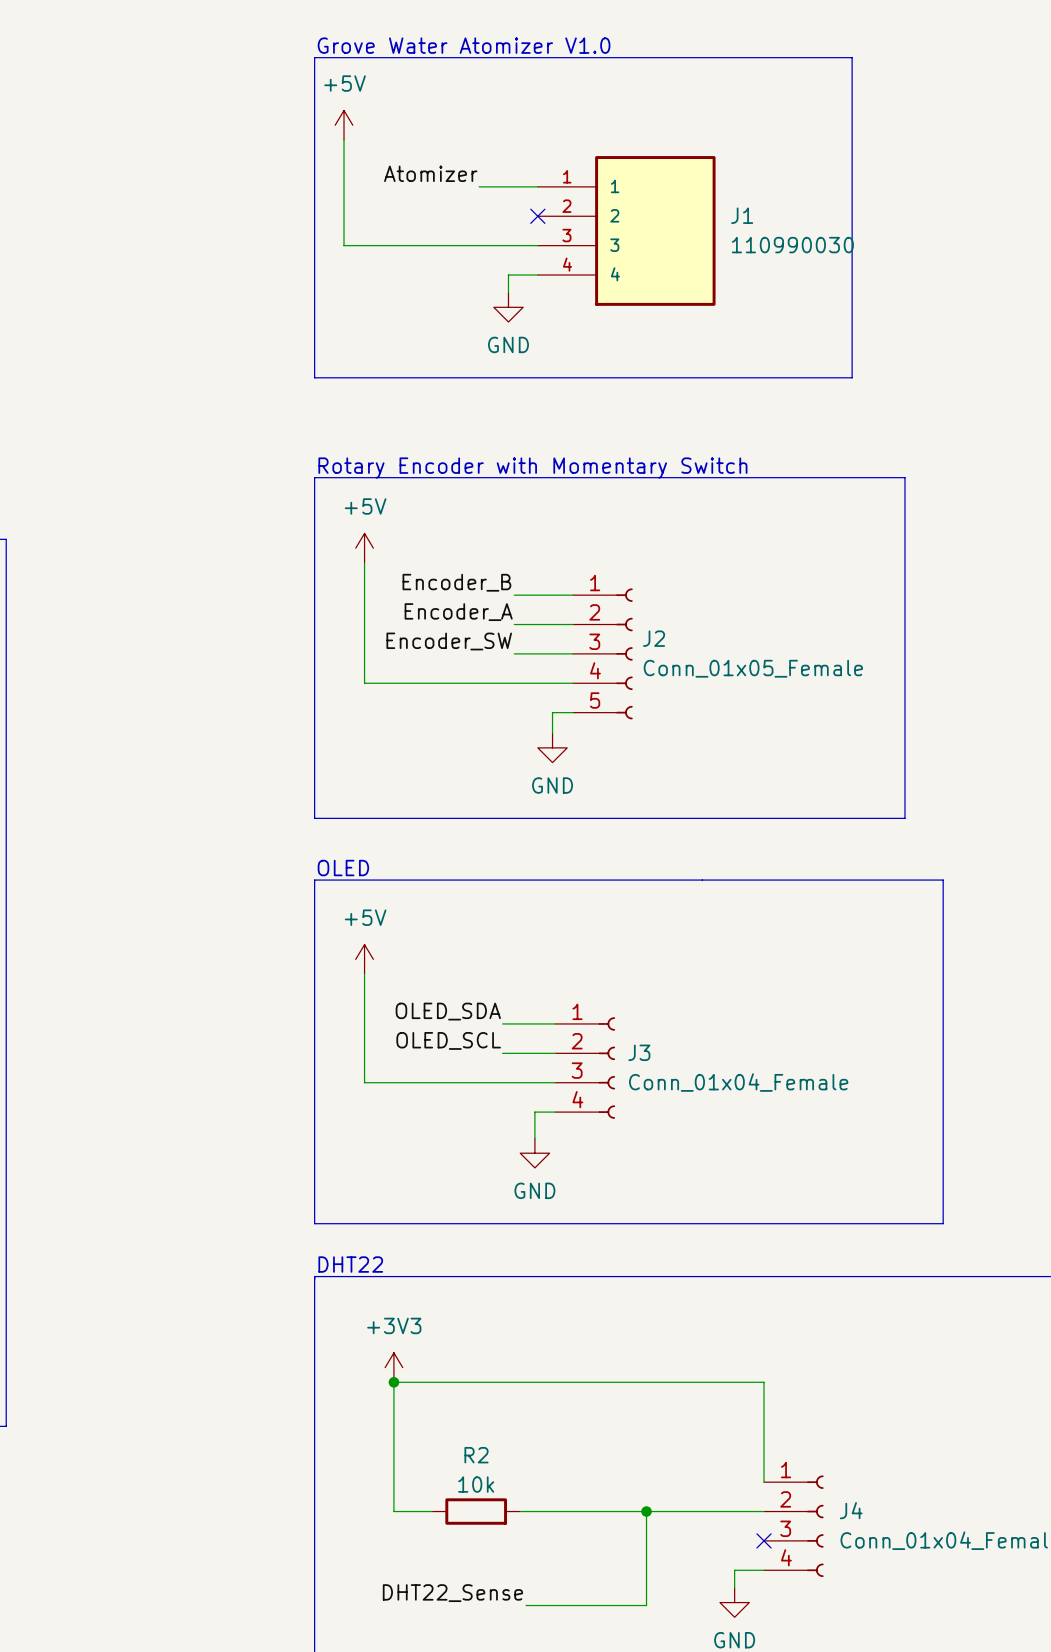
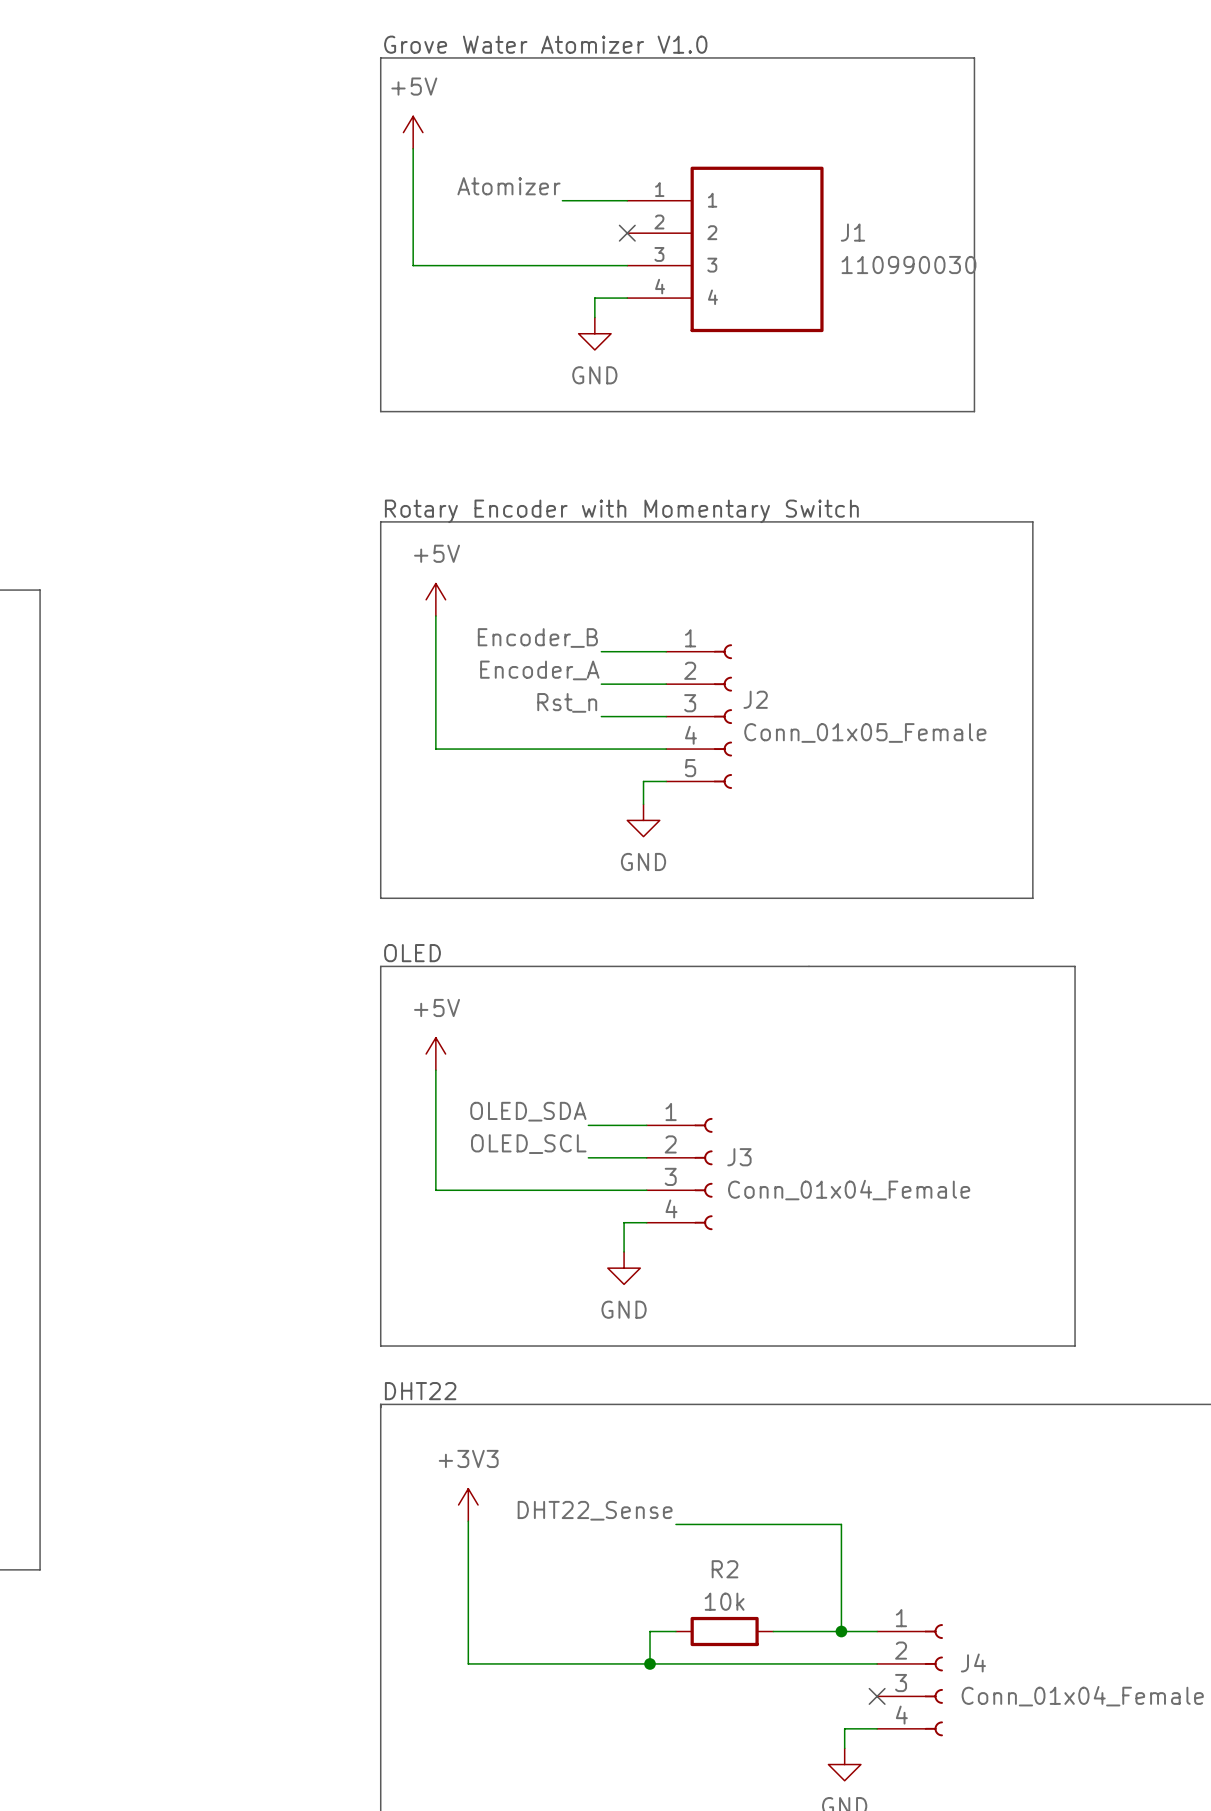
label: Encoder_SW (449, 641) -> Rst_n (567, 702)
wire: (393, 1382) (764, 1382) (764, 1482) -> (773, 1631) (877, 1631)
junction: (393, 1382) -> none
wire: none -> (675, 1524) (841, 1524) (841, 1631)
wire: none -> (675, 1631) (650, 1631) (650, 1663)
junction: none -> (841, 1631)
wire: none -> (510, 1663) (607, 1663)
R2 position: (476, 1511) -> (724, 1631)
junction: none -> (650, 1663)
wire: (646, 1511) (646, 1605) (526, 1605) -> none
junction: (646, 1511) -> none
label position: DHT22_Sense (452, 1593) -> DHT22_Sense (595, 1510)

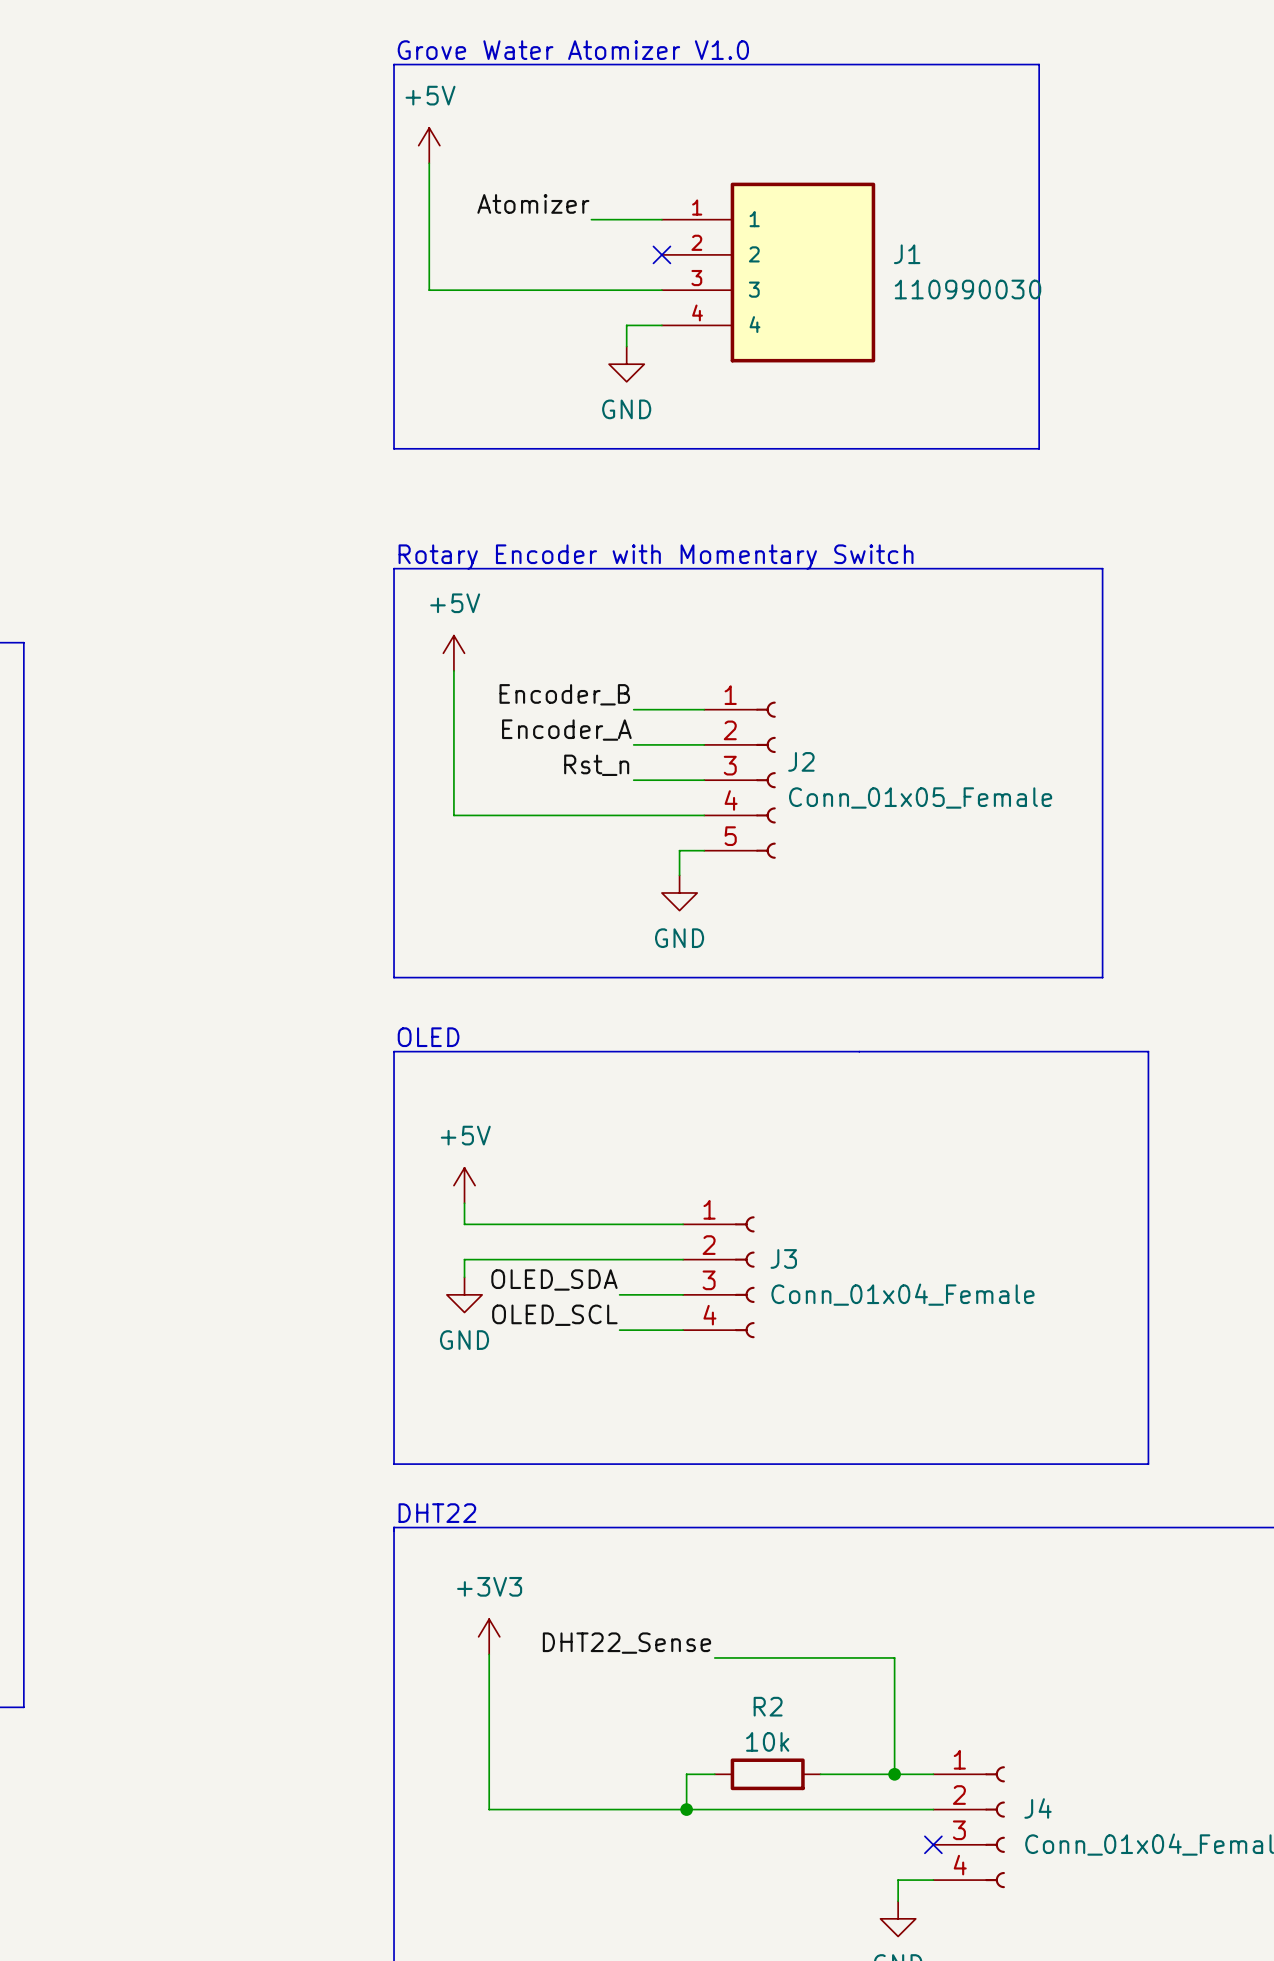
power symbol position: +5V (435, 1054) -> +5V (464, 1185)
wire: (435, 1070) (435, 1190) (588, 1190) -> none
wire: none -> (464, 1203) (464, 1224) (619, 1224)
label position: OLED_SDA (528, 1111) -> OLED_SDA (554, 1279)
label position: OLED_SCL (528, 1144) -> OLED_SCL (554, 1315)
wire: none -> (619, 1259) (464, 1259) (464, 1277)
wire: (624, 1222) (624, 1251) -> (658, 1330) (619, 1330)
power symbol position: GND (624, 1268) -> GND (464, 1294)

